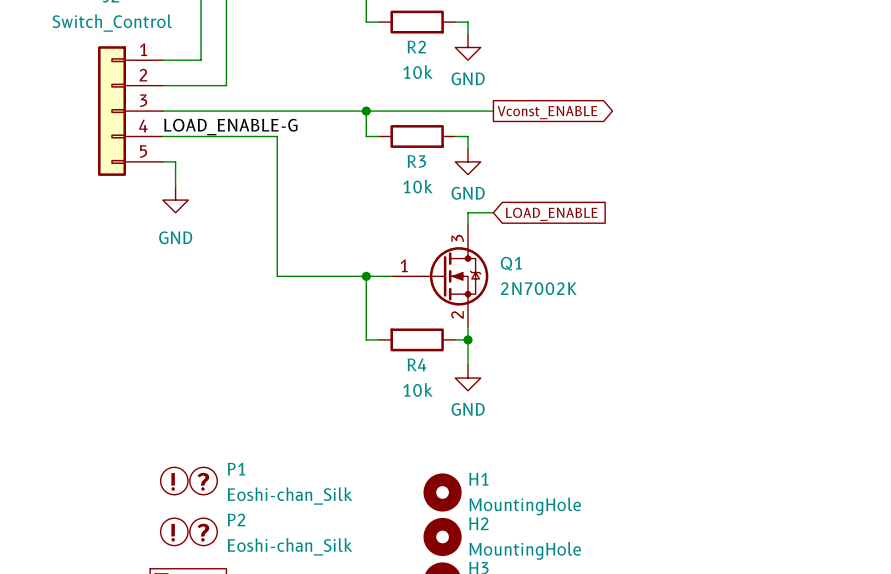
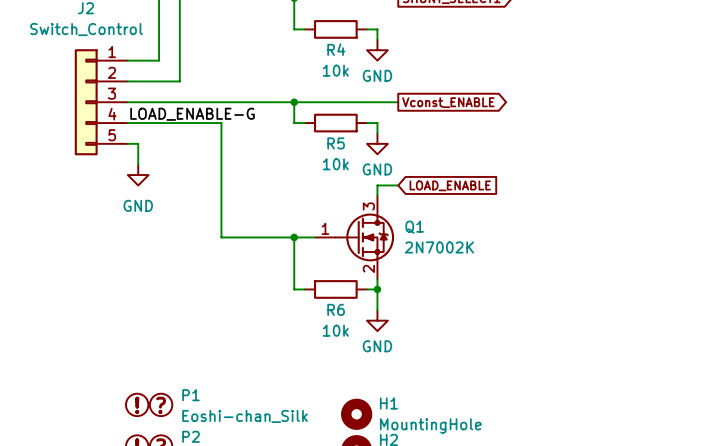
R2 name: R2 (416, 47) -> R4 (336, 49)
R3 name: R3 (416, 161) -> R5 (336, 143)
R4 name: R4 (416, 364) -> R6 (336, 309)

